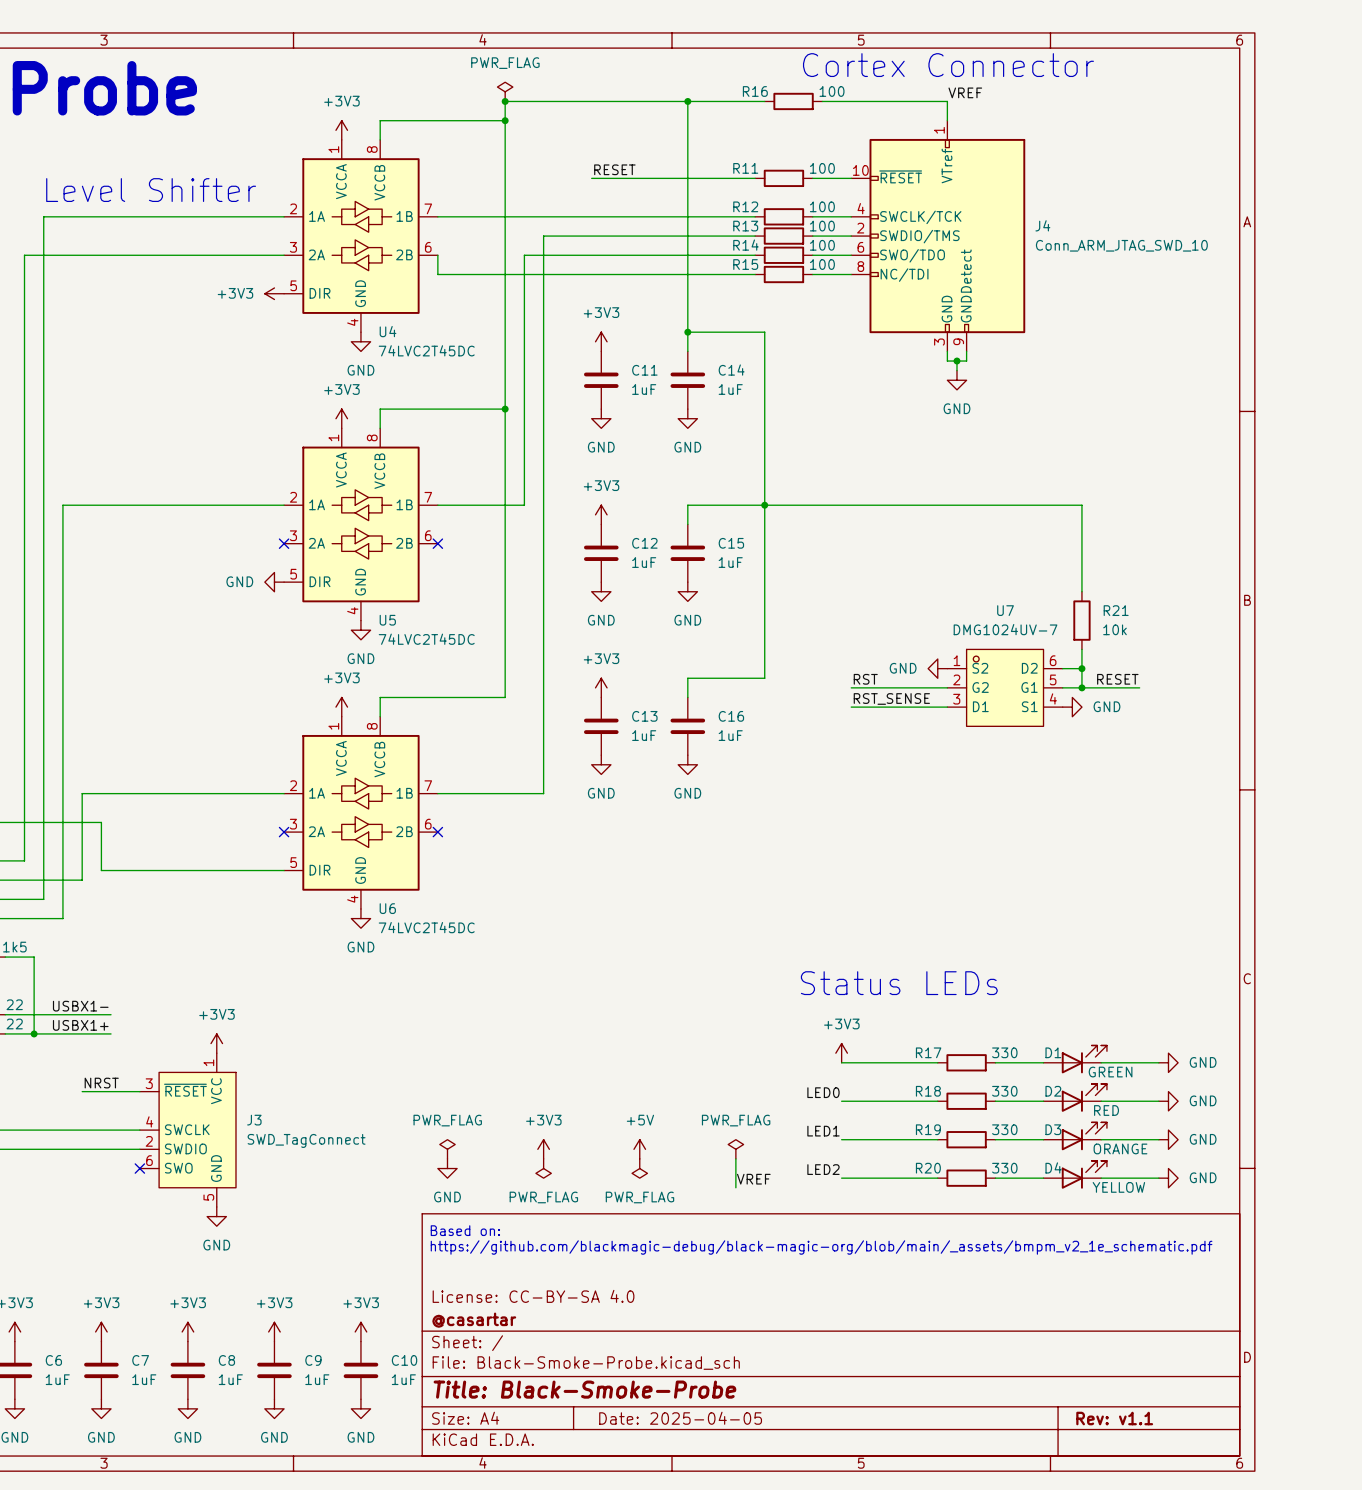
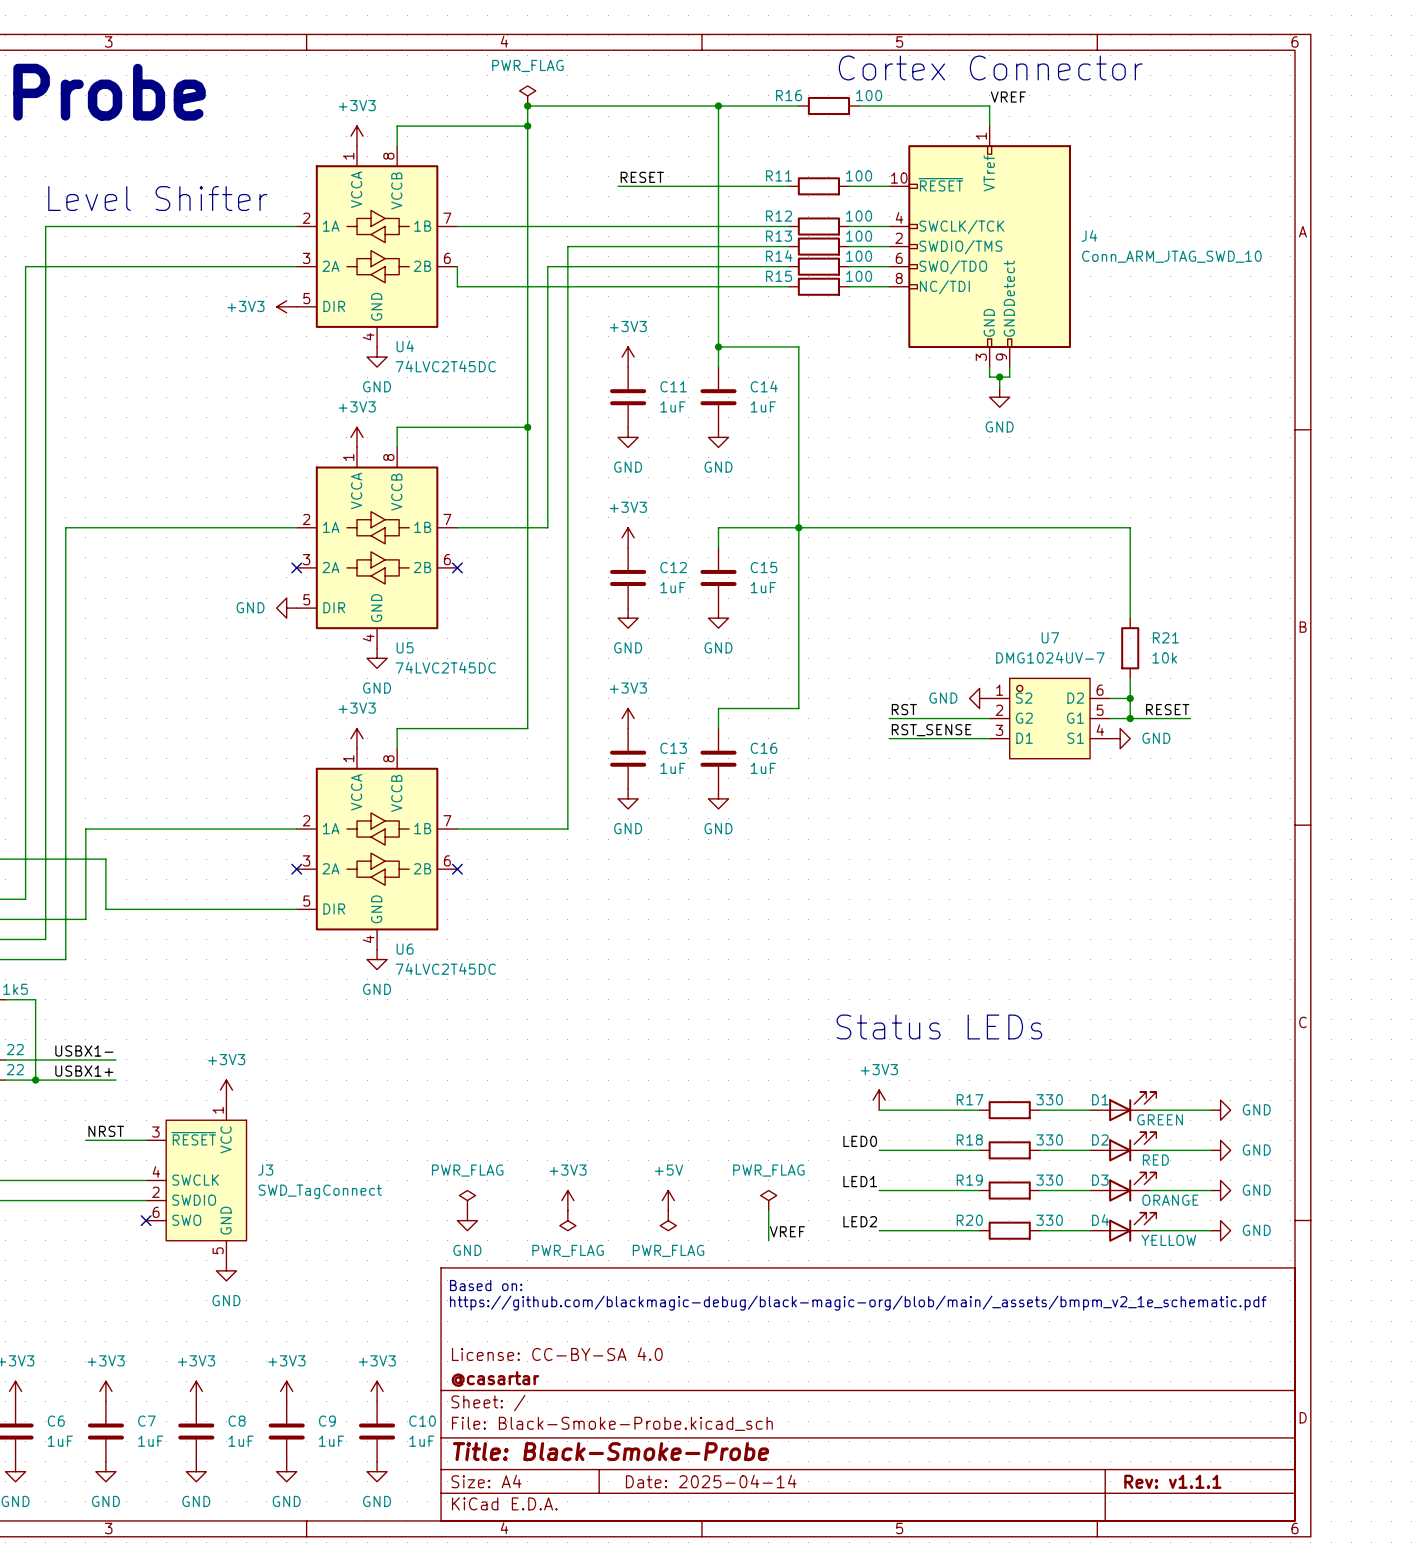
title block: Date: 2025-04-05 (680, 1418) -> Date: 2025-04-14 (711, 1481)
title block: Rev: v1.1 (1114, 1418) -> Rev: v1.1.1 (1172, 1481)

